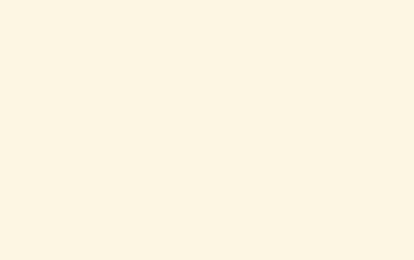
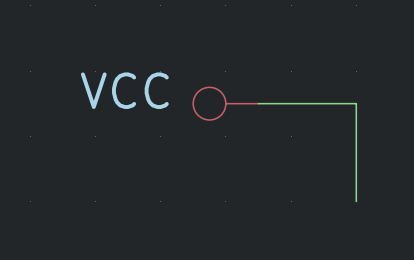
power symbol: none -> VCC (225, 103)
wire: none -> (258, 103) (356, 103) (356, 201)

